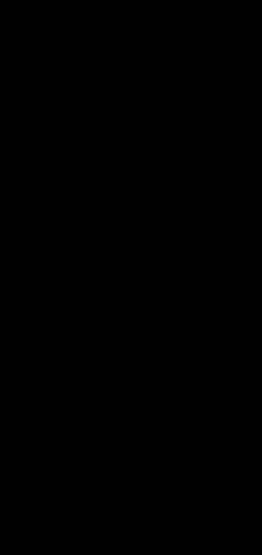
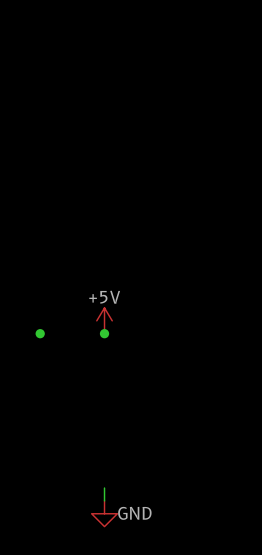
power symbol: none -> +5V (104, 320)
junction: none -> (40, 333)
junction: none -> (104, 333)
wire: none -> (104, 488) (104, 500)
power symbol: none -> GND (104, 513)

